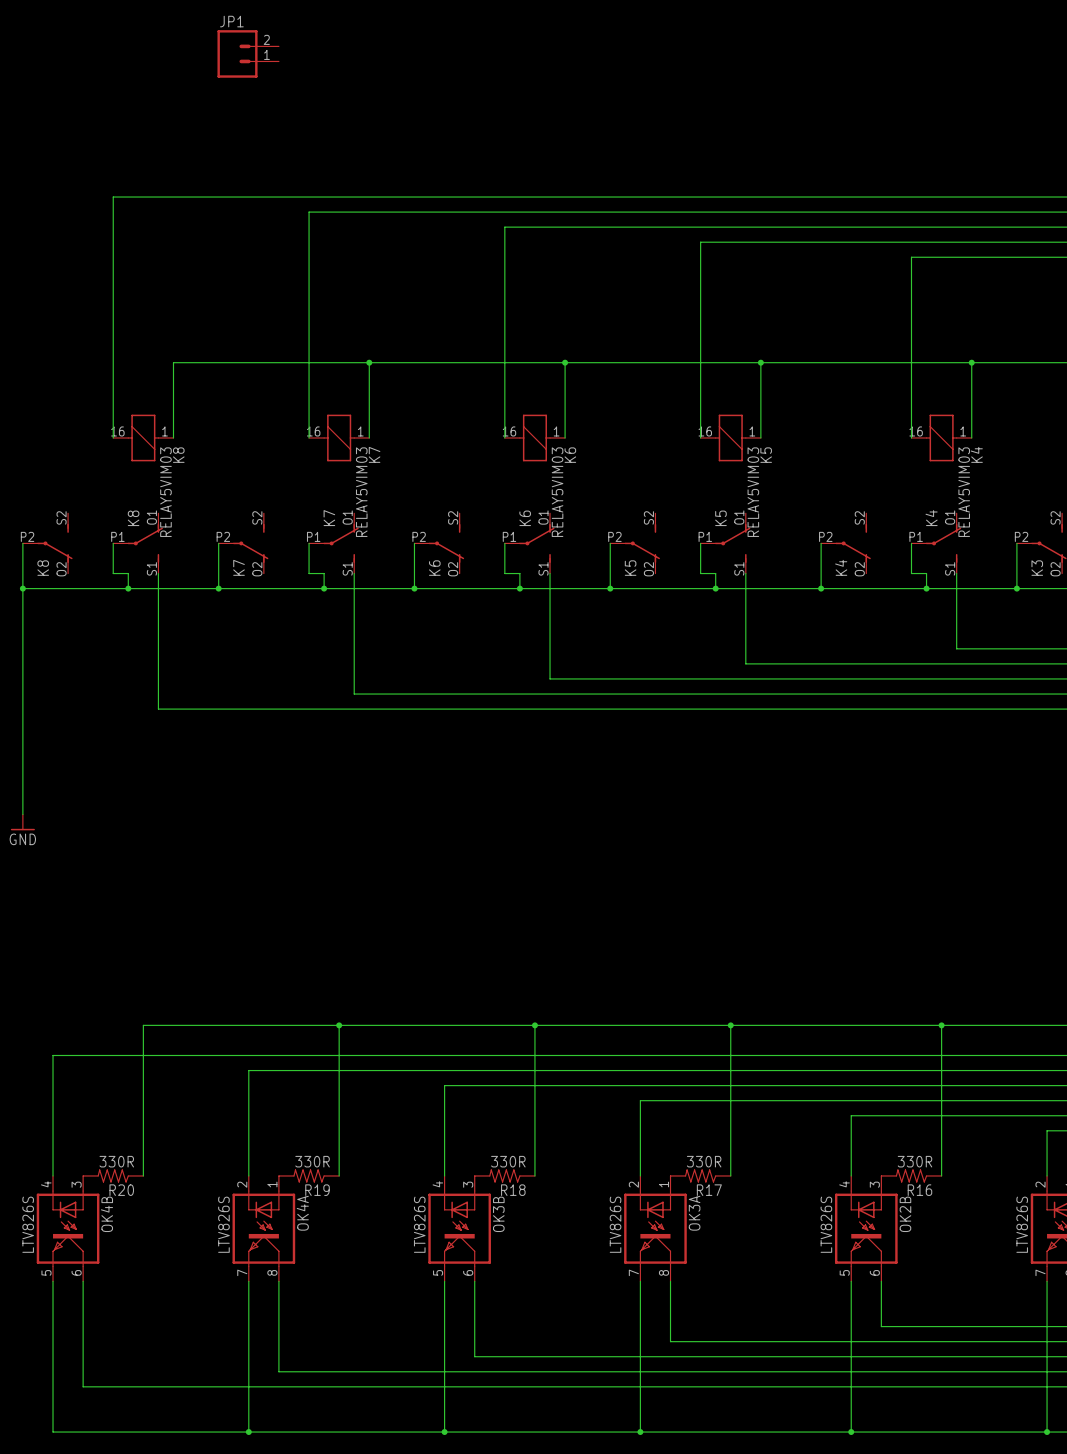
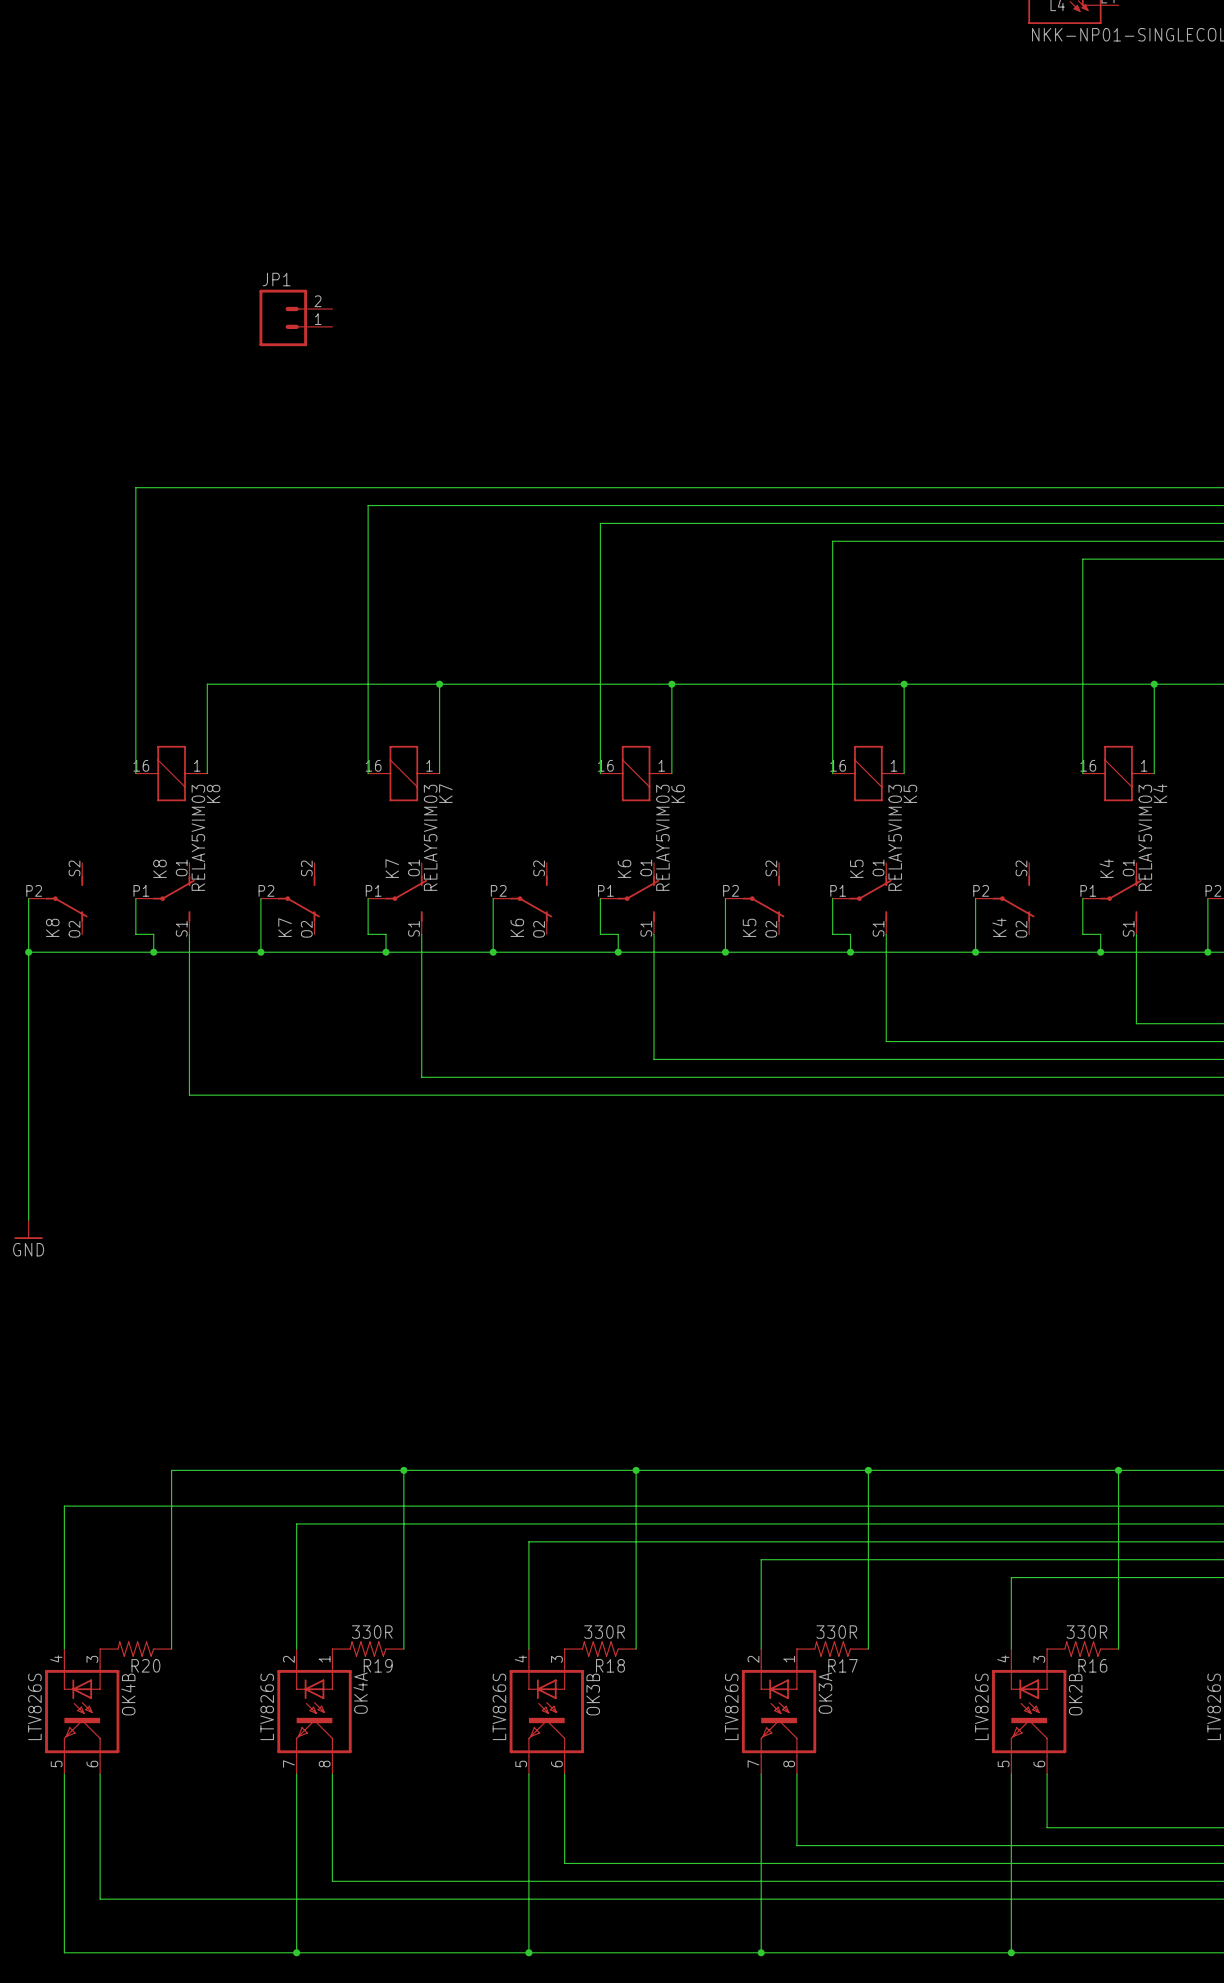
R20 value: 330R (116, 1161) -> none

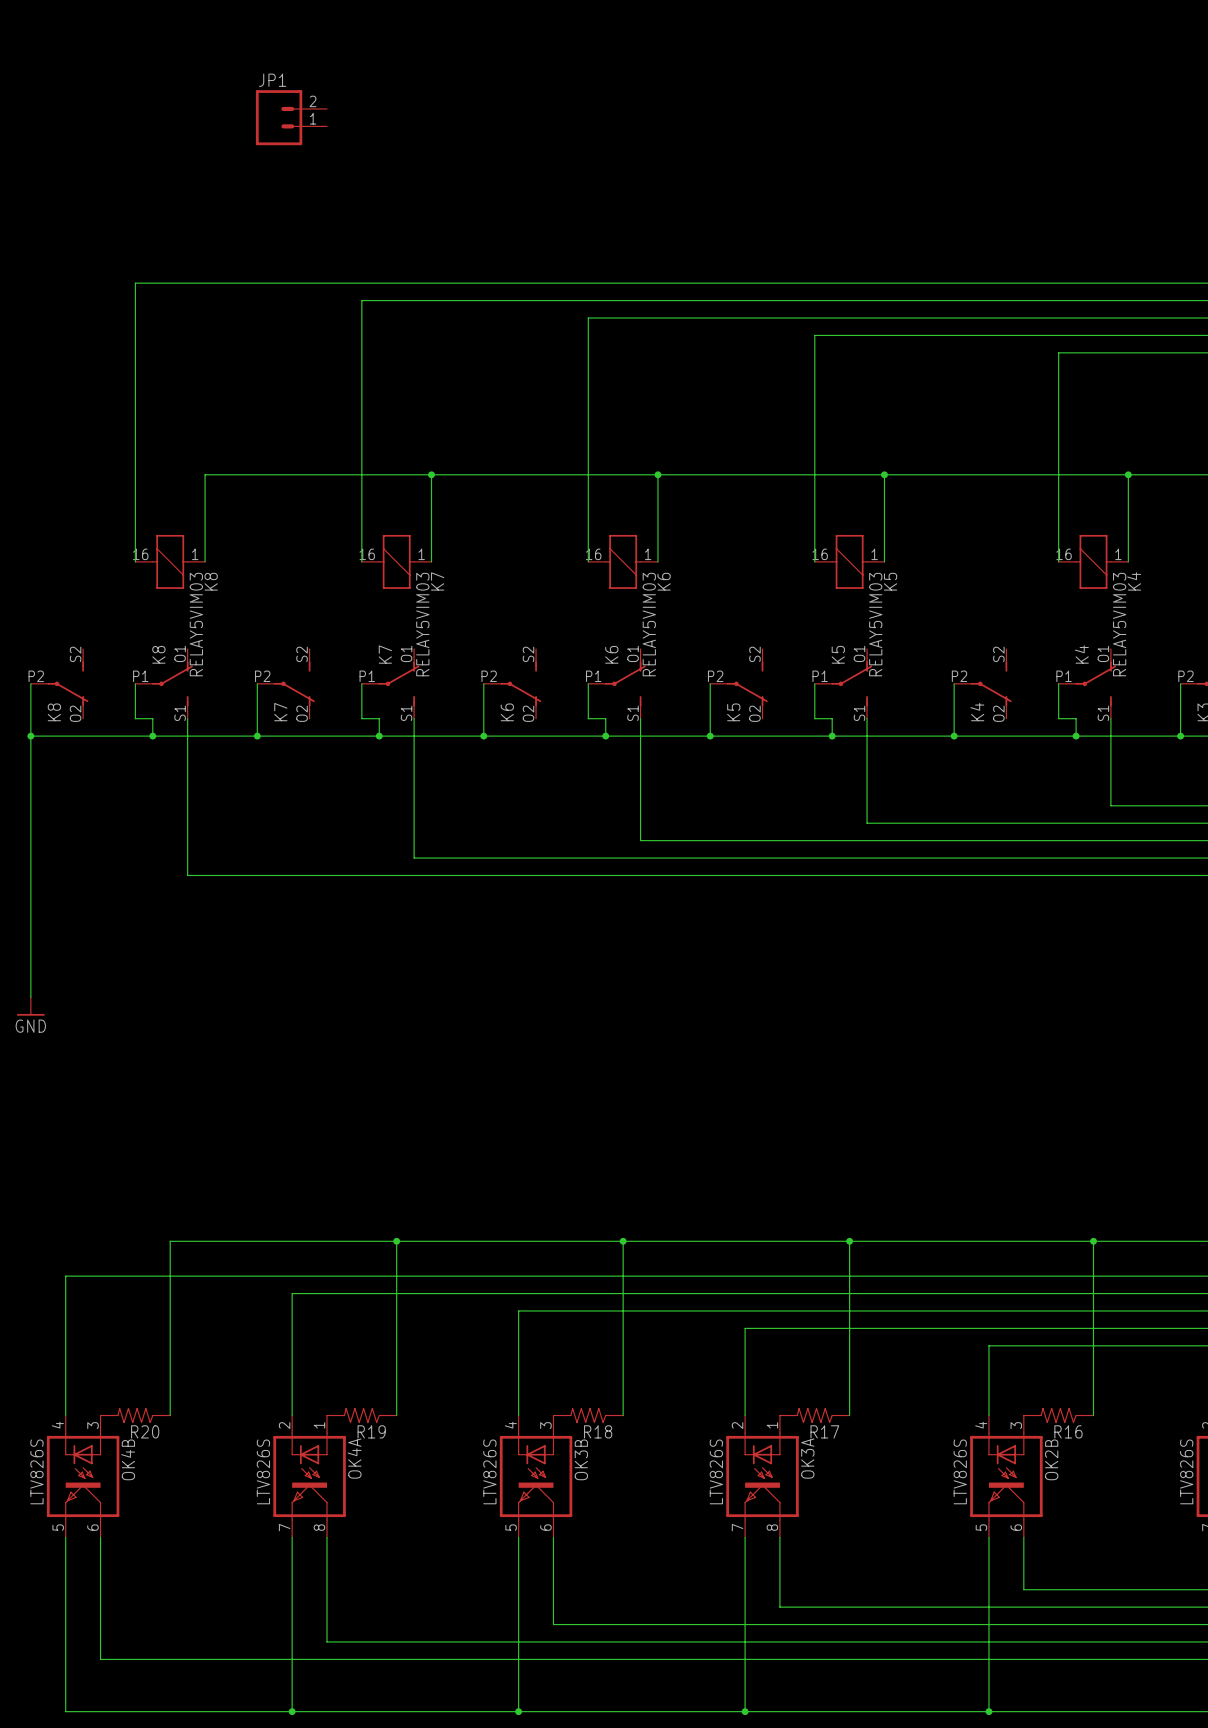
R19 value: 330R (372, 1632) -> none
R18 value: 330R (604, 1632) -> none
R17 value: 330R (836, 1632) -> none
R16 value: 330R (1086, 1632) -> none

